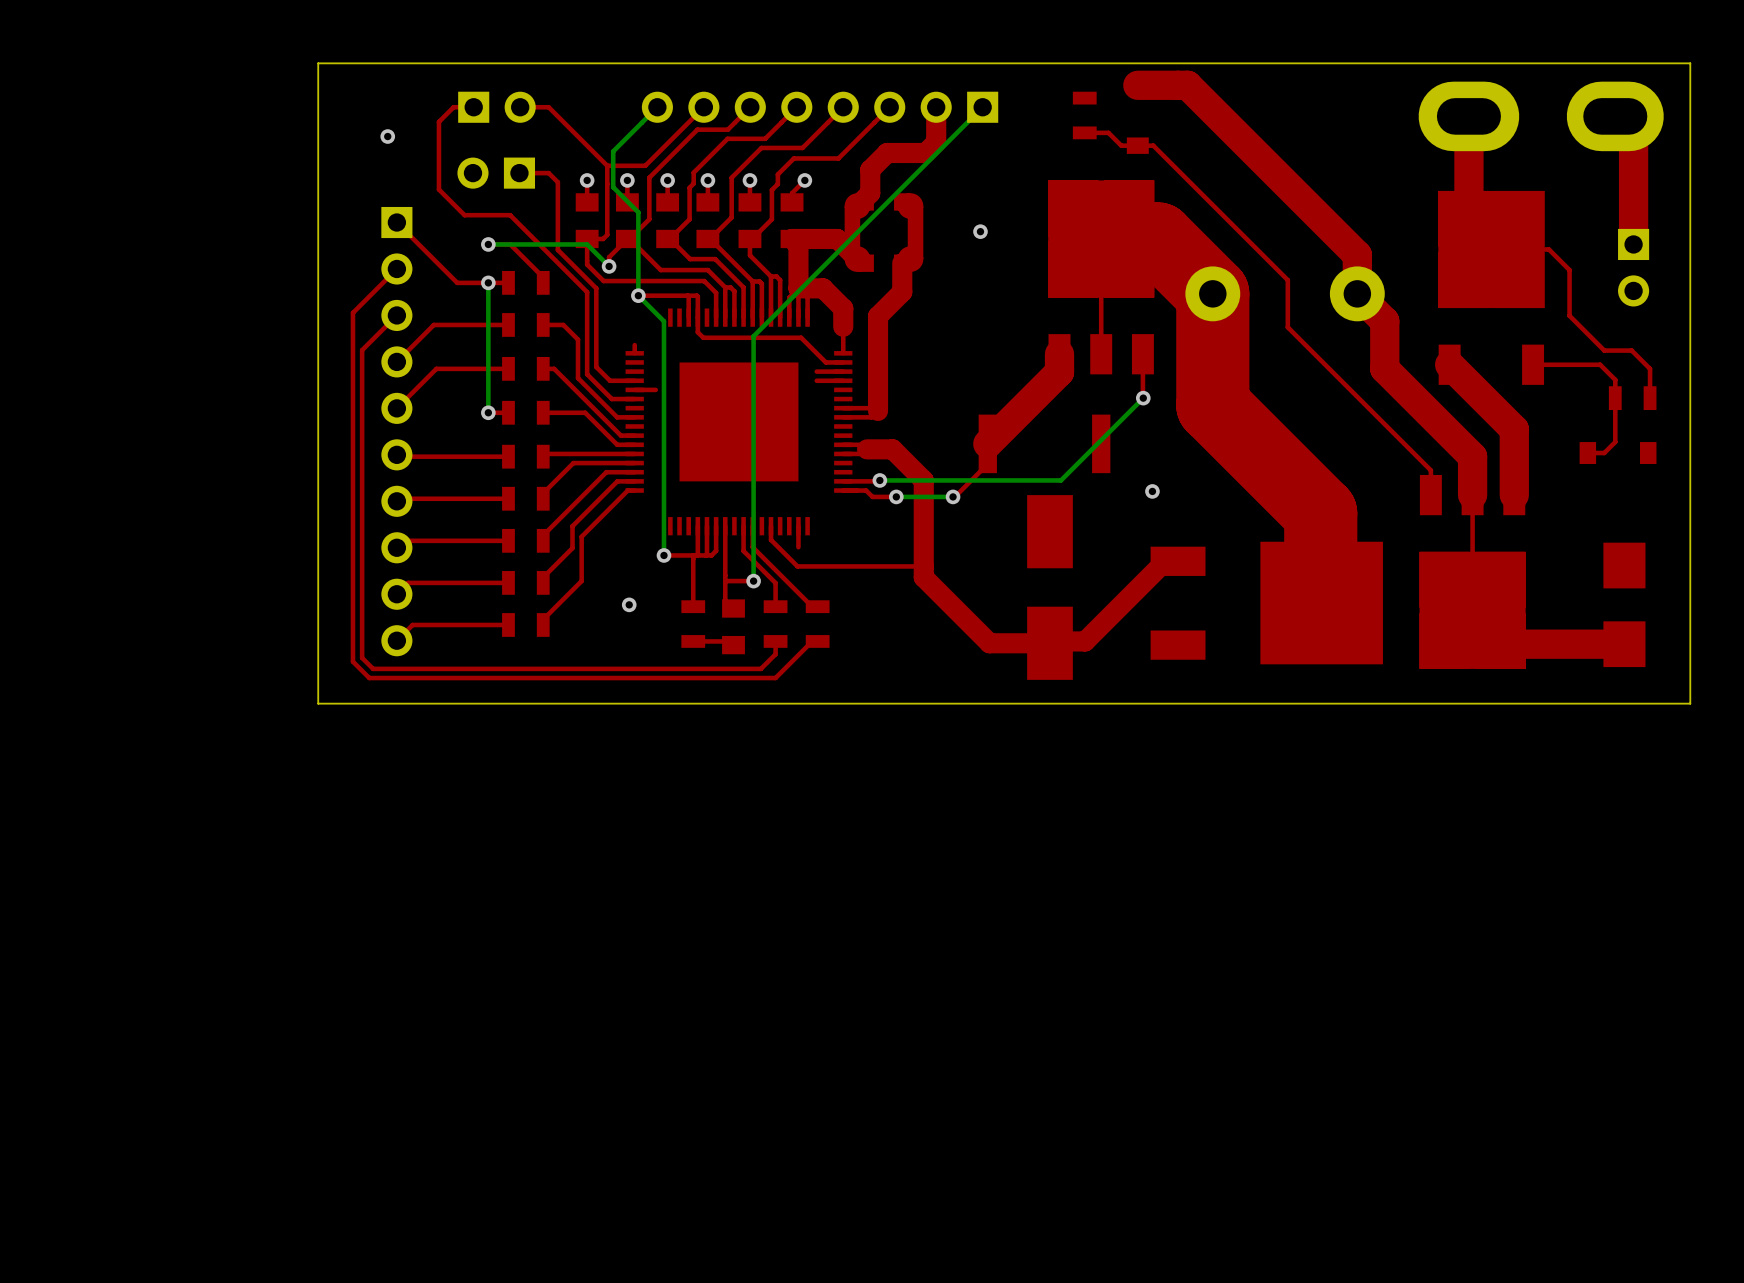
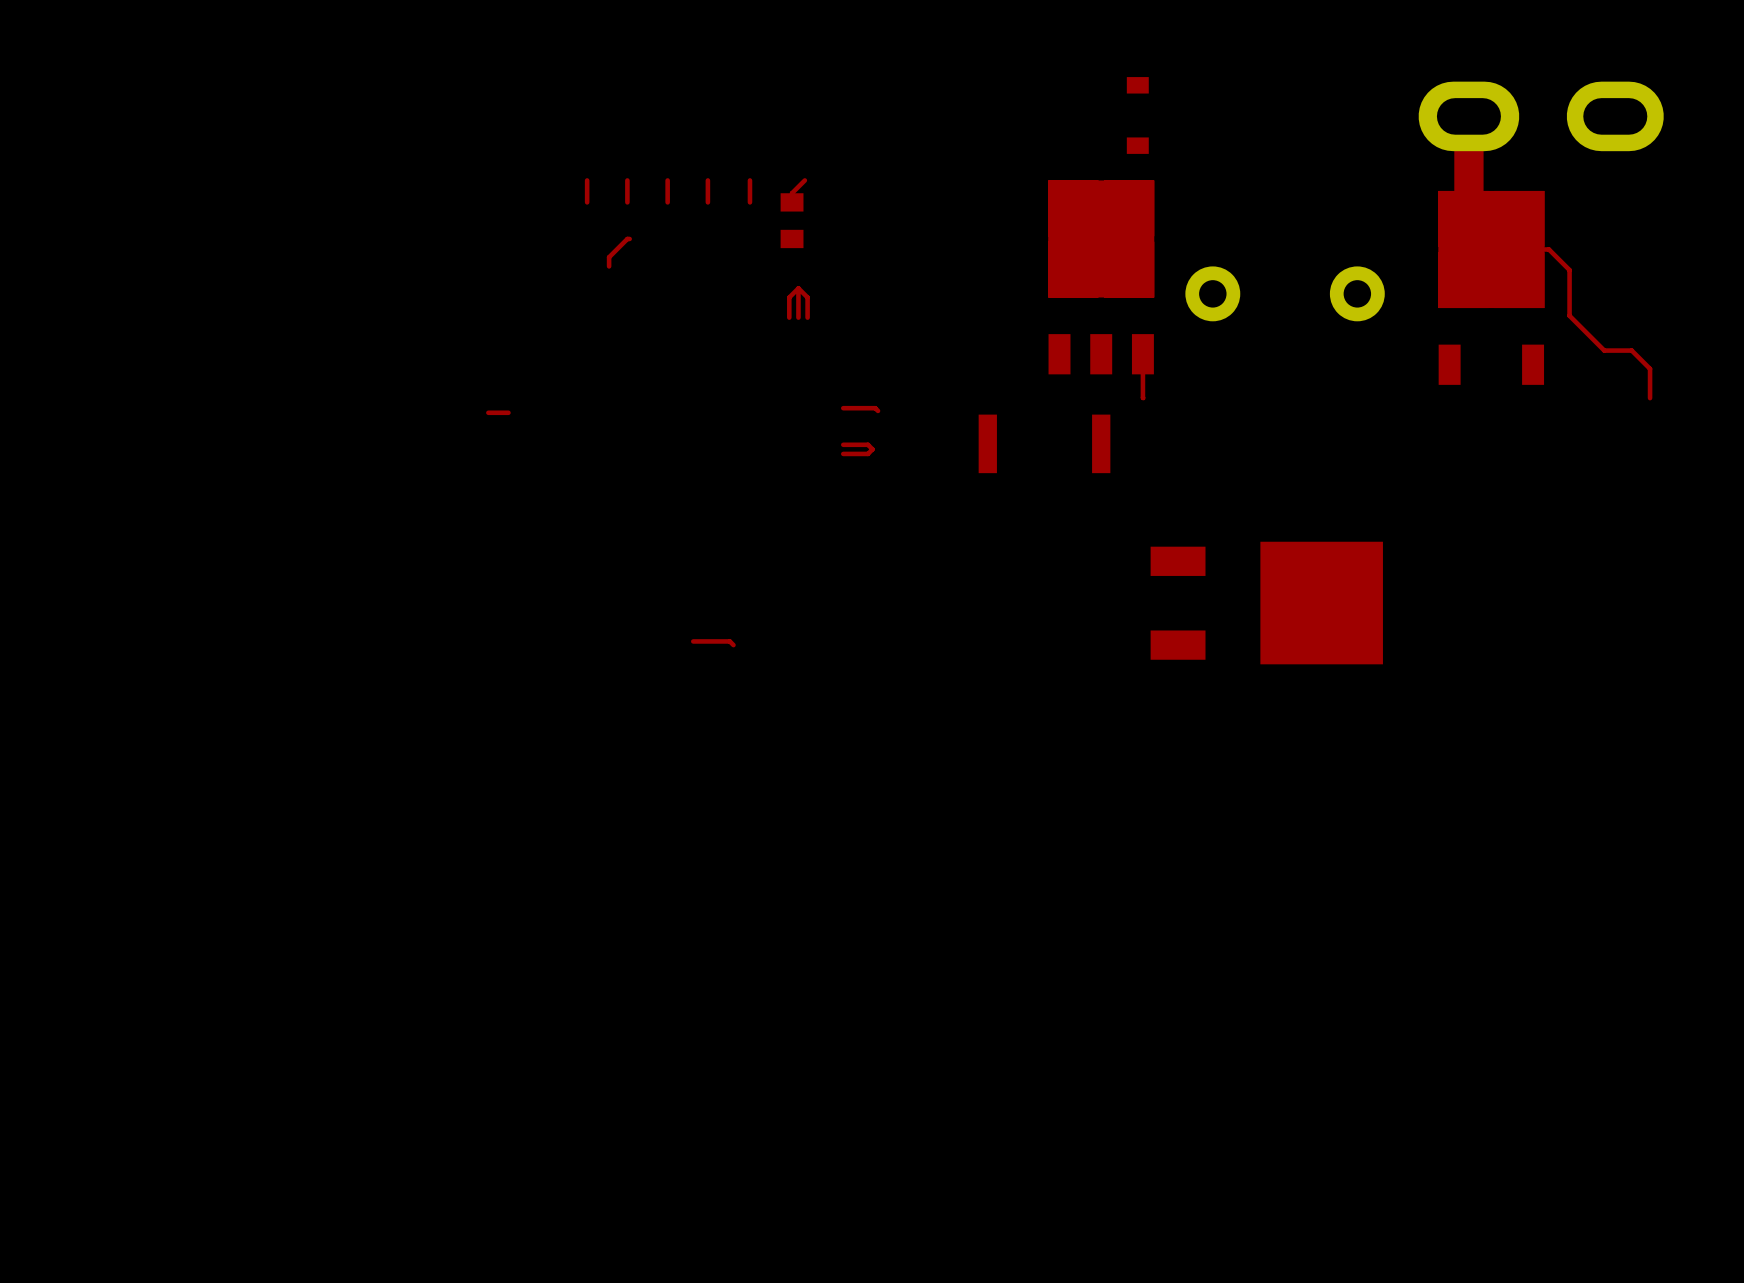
board edge: (1690, 63) (1690, 703) (318, 703) (318, 63) (1690, 63) -> none
top track: (1137, 85) (1187, 85) (1357, 255) (1357, 293) (1384, 321) (1384, 368) (1472, 456) (1472, 610) (1506, 644) (1624, 644) -> none
top track: (473, 107) (453, 107) (438, 121) (438, 189) (464, 215) (510, 215) (587, 292) (587, 374) (611, 399) (634, 399) -> none
part: (496, 107) -> none
top track: (520, 107) (548, 107) (607, 165) -> none
top track: (703, 107) (645, 165) (607, 165) -> none
top track: (750, 107) (727, 129) (697, 129) (649, 177) (649, 219) (629, 238) (660, 270) (707, 270) (725, 287) -> none
top track: (796, 107) (765, 138) (727, 138) (693, 172) (693, 183) (689, 187) (689, 219) (669, 238) -> none
part: (820, 107) -> none
top track: (843, 107) (802, 147) (761, 147) (731, 177) (731, 217) (710, 238) -> none
top track: (889, 107) (838, 158) (793, 158) (777, 174) (777, 184) (771, 190) (771, 219) (752, 238) (749, 238) (749, 255) (771, 276) -> none
top track: (936, 107) (936, 142) (925, 152) (887, 152) (870, 169) (870, 193) (857, 206) -> none
bottom track: (982, 107) (753, 336) (753, 581) -> none
bottom track: (663, 113) (657, 107) (613, 151) (613, 187) (638, 212) (638, 295) (663, 321) (663, 555) -> none
part: (1084, 115) -> none
top track: (1615, 116) (1633, 134) (1633, 244) -> none
top track: (1084, 132) (1108, 132) (1121, 145) (1153, 145) (1287, 280) (1287, 327) (1430, 470) (1430, 495) -> none
via: (387, 136) -> none
top track: (607, 165) (607, 234) (603, 238) (587, 238) (587, 264) (603, 281) (704, 281) (716, 292) (716, 317) -> none
part: (496, 173) -> none
top track: (519, 173) (548, 173) (557, 182) (557, 249) (596, 288) (596, 367) (610, 380) (634, 380) -> none
via: (587, 180) -> none
via: (627, 180) -> none
via: (667, 180) -> none
via: (707, 180) -> none
via: (749, 180) -> none
via: (804, 180) -> none
part: (587, 220) -> none
part: (627, 220) -> none
part: (667, 220) -> none
part: (707, 220) -> none
part: (749, 220) -> none
top track: (396, 222) (457, 282) (508, 282) -> none
via: (980, 231) -> none
part: (883, 232) -> none
top track: (669, 238) (690, 259) (715, 259) (743, 287) (743, 317) -> none
top track: (710, 238) (752, 281) -> none
top track: (488, 244) (510, 244) (543, 277) (543, 282) -> none
bottom track: (488, 244) (587, 244) (609, 266) -> none
via: (488, 244) -> none
top track: (857, 259) (837, 238) (792, 238) (798, 245) (798, 288) (823, 288) (843, 308) (843, 353) -> none
top track: (902, 263) (902, 292) (878, 316) (878, 410) (871, 417) (843, 417) -> none
via: (609, 266) -> none
part: (1633, 267) -> none
top track: (396, 268) (352, 312) (352, 661) (369, 678) (775, 678) (812, 641) (817, 641) -> none
top track: (771, 276) (771, 317) -> none
top track: (771, 276) (776, 276) (780, 280) (780, 317) -> none
top track: (752, 281) (752, 317) -> none
top track: (752, 281) (759, 281) (761, 283) (761, 317) -> none
bottom track: (488, 282) (488, 412) -> none
via: (488, 282) -> none
part: (525, 282) -> none
top track: (725, 287) (725, 317) -> none
top track: (725, 287) (730, 287) (734, 291) (734, 317) -> none
top track: (638, 295) (696, 295) (697, 332) (703, 337) (801, 337) (825, 362) (843, 362) -> none
via: (638, 295) -> none
top track: (687, 295) (688, 317) -> none
top track: (396, 315) (362, 350) (362, 657) (373, 668) (760, 668) (775, 654) (775, 641) -> none
top track: (508, 324) (433, 324) (396, 361) -> none
part: (525, 324) -> none
top track: (543, 324) (563, 324) (578, 339) (578, 378) (617, 417) (634, 417) -> none
top track: (634, 345) (634, 353) -> none
top track: (1059, 354) (1059, 372) (987, 443) (987, 463) (953, 496) -> none
top track: (1101, 354) (1101, 238) (1157, 238) (1212, 293) (1212, 405) (1320, 513) (1321, 603) -> none
top track: (1449, 364) (1514, 429) (1514, 495) -> none
top track: (1533, 364) (1600, 364) (1615, 379) (1615, 442) (1604, 453) (1587, 453) -> none
top track: (508, 368) (436, 368) (396, 408) -> none
part: (525, 368) -> none
top track: (543, 368) (554, 368) (620, 435) (634, 435) -> none
top track: (843, 371) (816, 371) -> none
top track: (843, 380) (816, 380) -> none
top track: (655, 389) (634, 389) -> none
bottom track: (1143, 398) (1060, 480) (879, 480) -> none
via: (1143, 398) -> none
part: (1632, 398) -> none
via: (488, 412) -> none
part: (525, 412) -> none
top track: (543, 412) (585, 412) (617, 444) (634, 444) -> none
part: (738, 421) -> none
part: (396, 431) -> none
top track: (867, 449) (892, 449) (923, 480) (923, 577) (989, 643) (1085, 641) (1165, 561) (1178, 561) -> none
top track: (634, 453) (545, 453) (543, 456) -> none
part: (1618, 453) -> none
top track: (396, 454) (398, 456) (508, 456) -> none
part: (525, 456) -> none
top track: (634, 463) (573, 463) (543, 493) (543, 498) -> none
top track: (634, 472) (606, 472) (543, 535) (543, 540) -> none
top track: (879, 480) (843, 481) -> none
via: (879, 480) -> none
top track: (634, 481) (617, 481) (572, 526) (572, 548) (543, 577) (543, 582) -> none
top track: (634, 490) (627, 490) (581, 536) (581, 581) (543, 619) (543, 624) -> none
top track: (843, 490) (866, 490) (872, 496) (896, 496) -> none
via: (1152, 491) -> none
via: (896, 496) -> none
bottom track: (953, 496) (896, 496) -> none
via: (953, 496) -> none
top track: (508, 498) (399, 498) (396, 501) -> none
part: (525, 498) -> none
top track: (697, 526) (696, 555) -> none
top track: (706, 526) (706, 555) -> none
top track: (716, 526) (716, 550) (711, 555) (663, 555) -> none
top track: (725, 526) (725, 600) (733, 608) -> none
top track: (743, 526) (743, 551) (775, 583) (775, 606) -> none
top track: (752, 526) (752, 547) (812, 606) (817, 606) -> none
top track: (771, 526) (771, 539) (797, 566) (923, 566) -> none
top track: (798, 526) (798, 547) -> none
top track: (508, 540) (403, 540) (396, 547) -> none
part: (525, 540) -> none
via: (663, 555) -> none
top track: (693, 555) (693, 606) -> none
part: (1472, 571) -> none
top track: (753, 581) (725, 581) -> none
via: (753, 581) -> none
top track: (508, 582) (408, 582) (396, 594) -> none
part: (525, 582) -> none
part: (1049, 587) -> none
via: (629, 604) -> none
part: (1624, 604) -> none
top track: (508, 624) (412, 624) (396, 640) -> none
part: (525, 624) -> none
part: (693, 624) -> none
part: (775, 624) -> none
part: (817, 624) -> none
part: (733, 626) -> none

